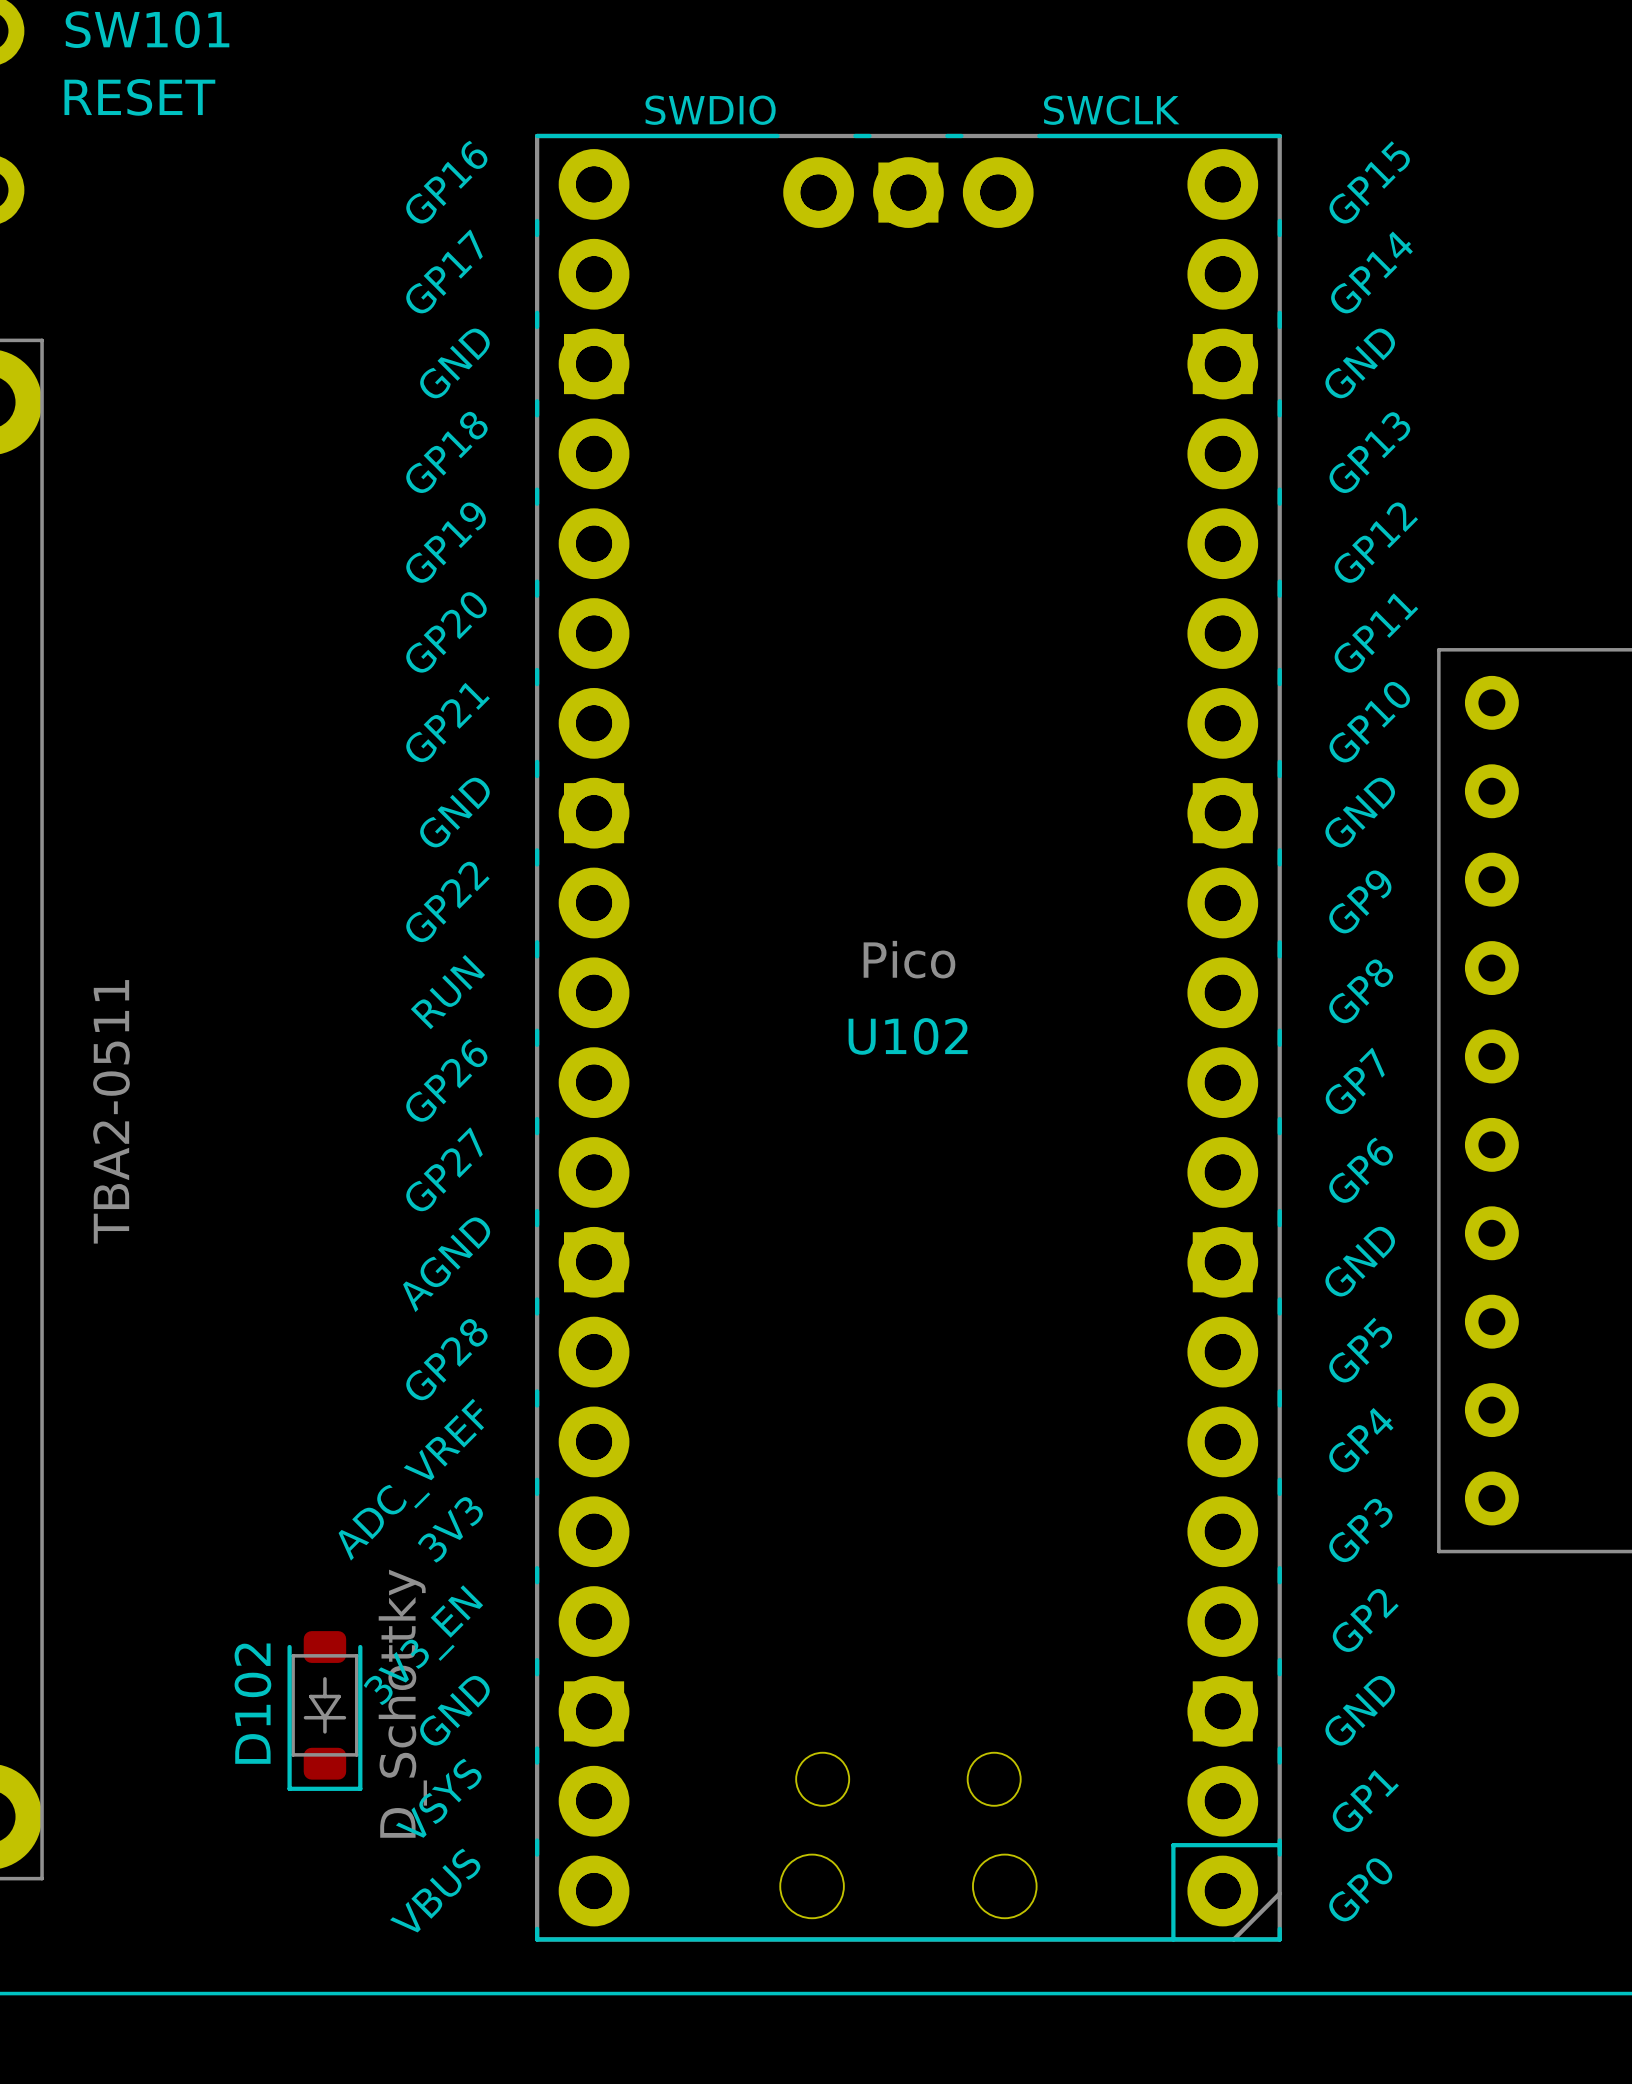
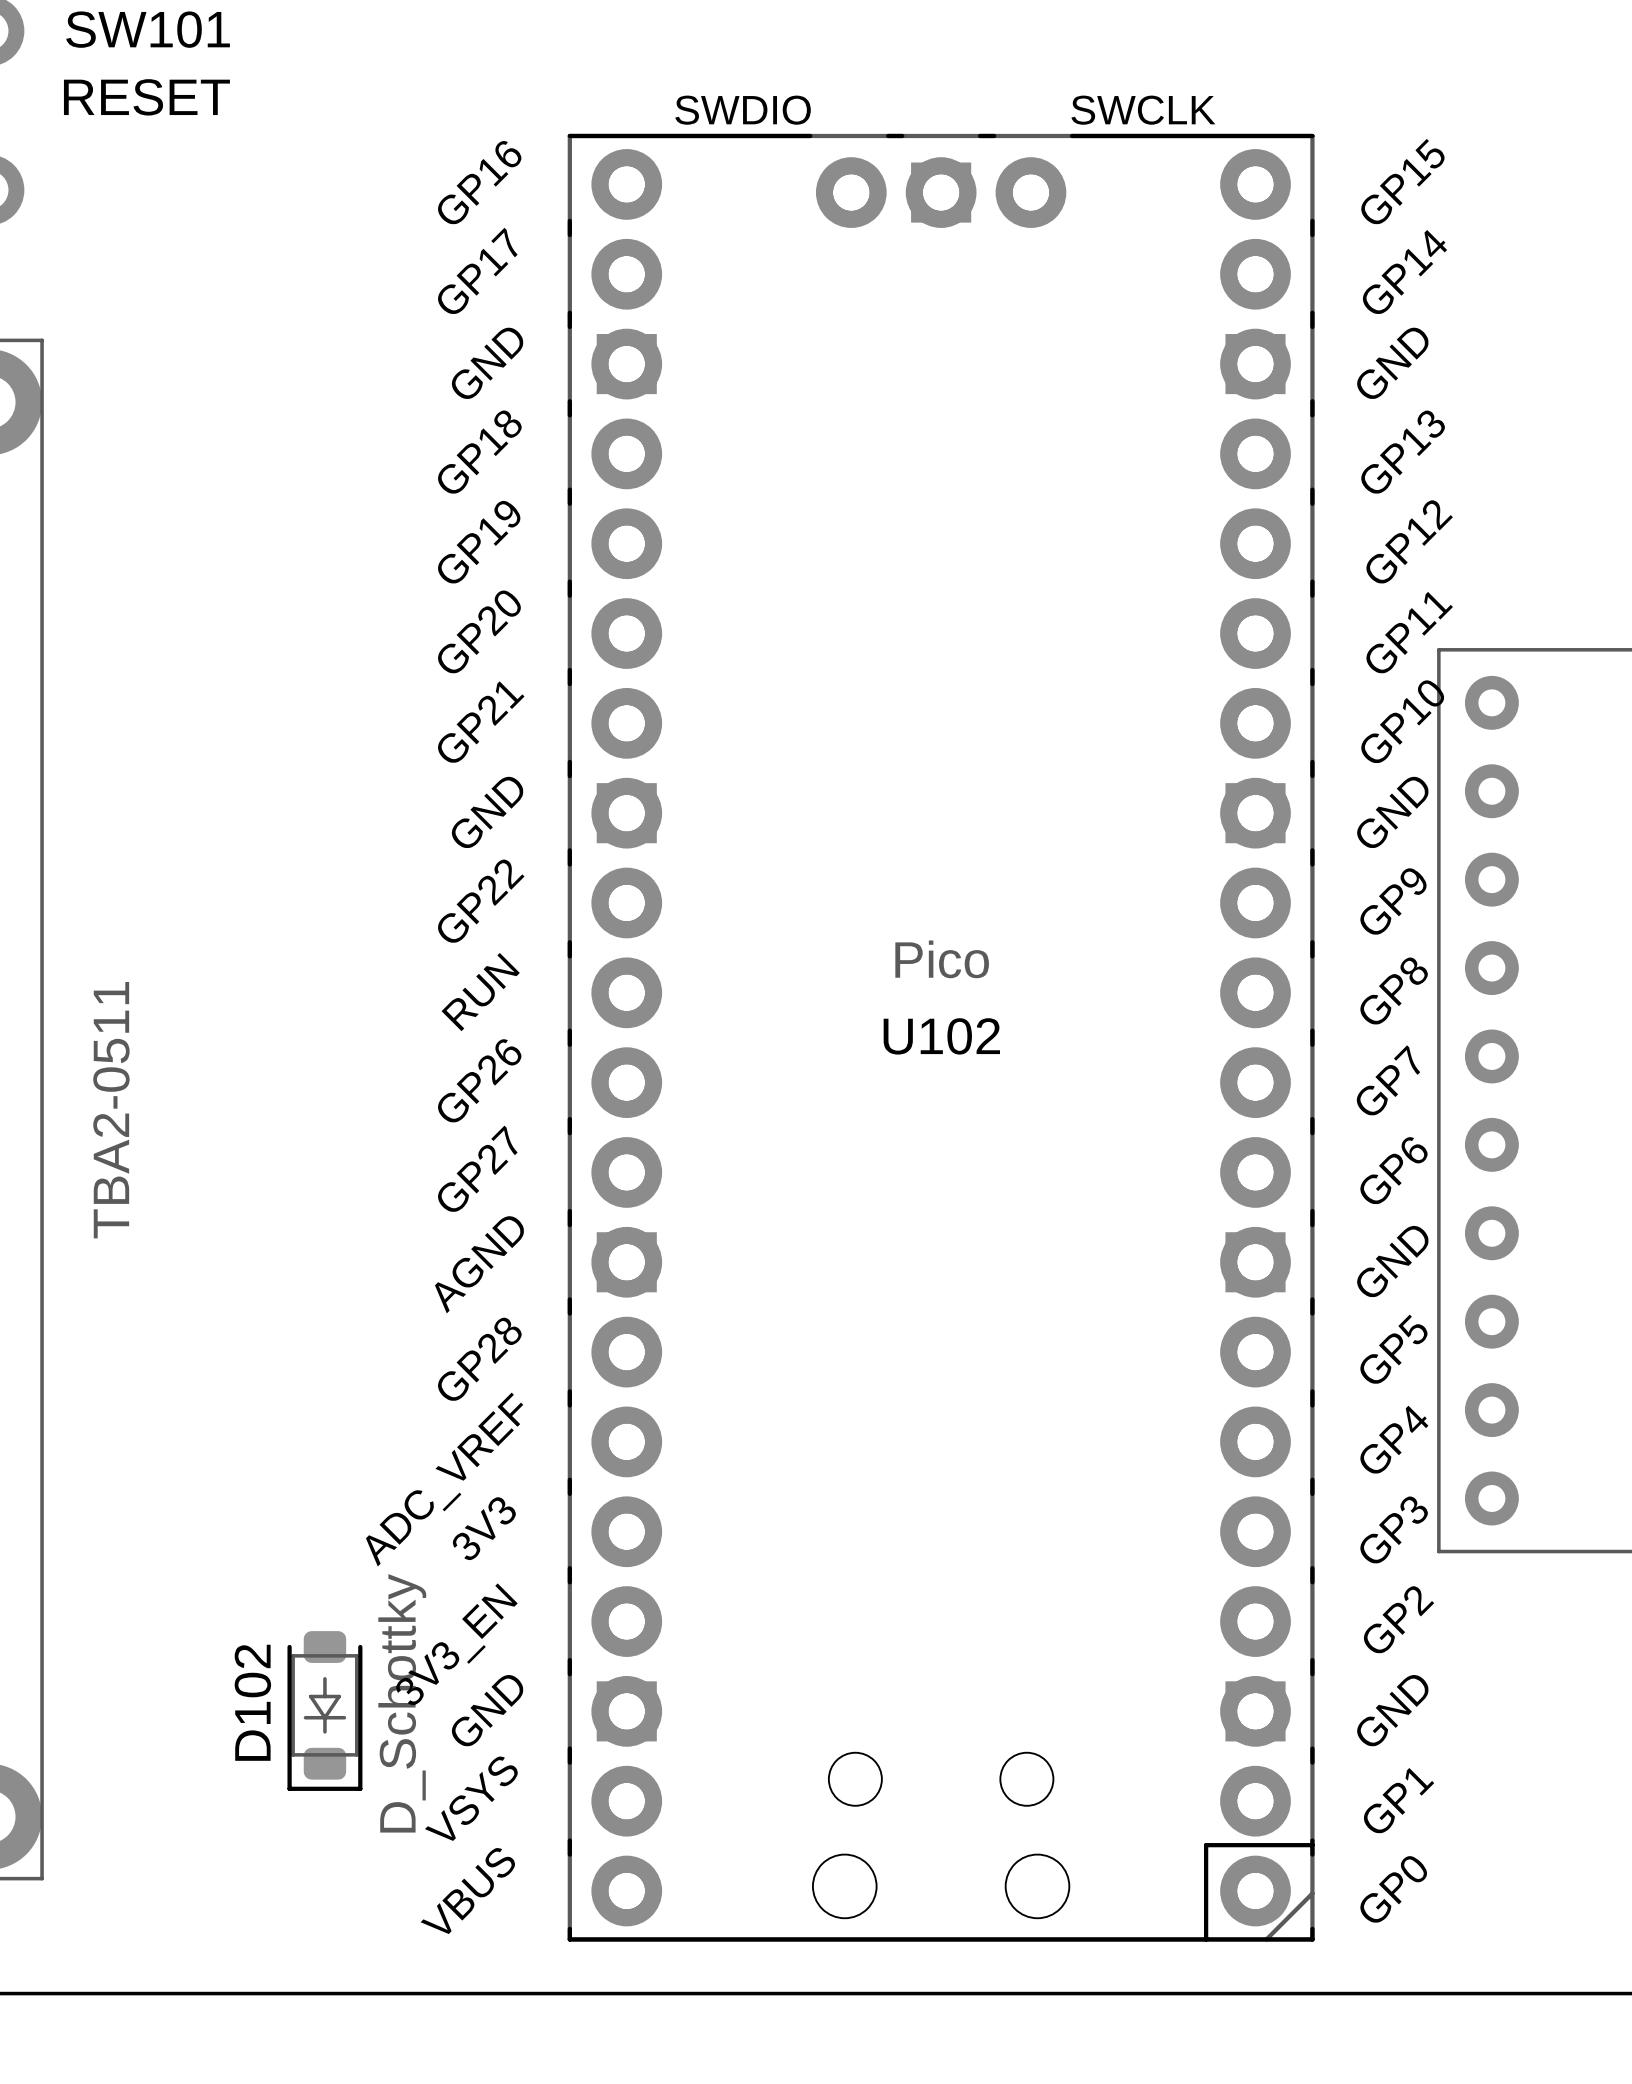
U102 position: (908, 1037) -> (941, 1037)

